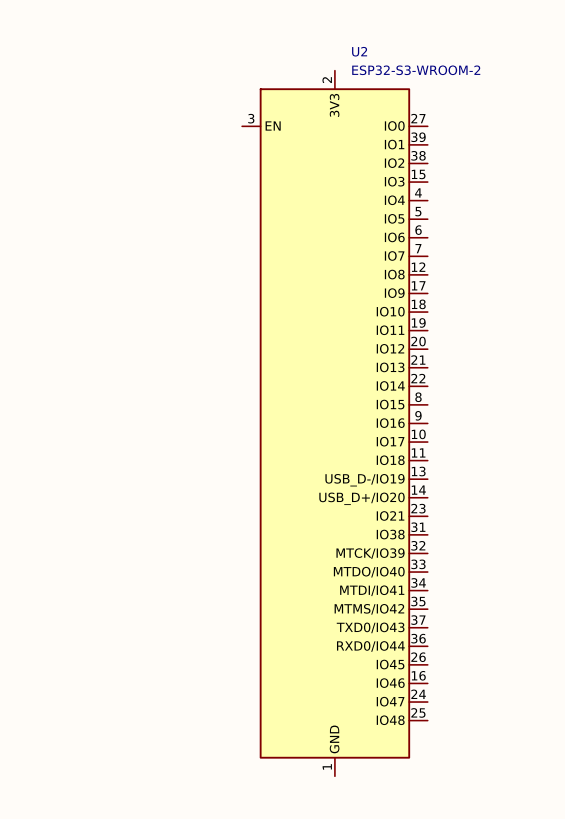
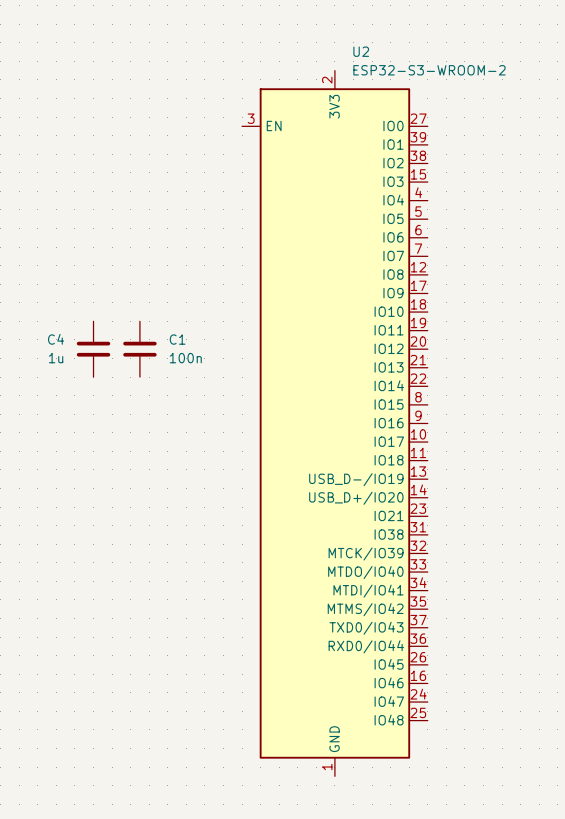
C4: none -> 1u (93, 349)
C1: none -> 100n (139, 349)

